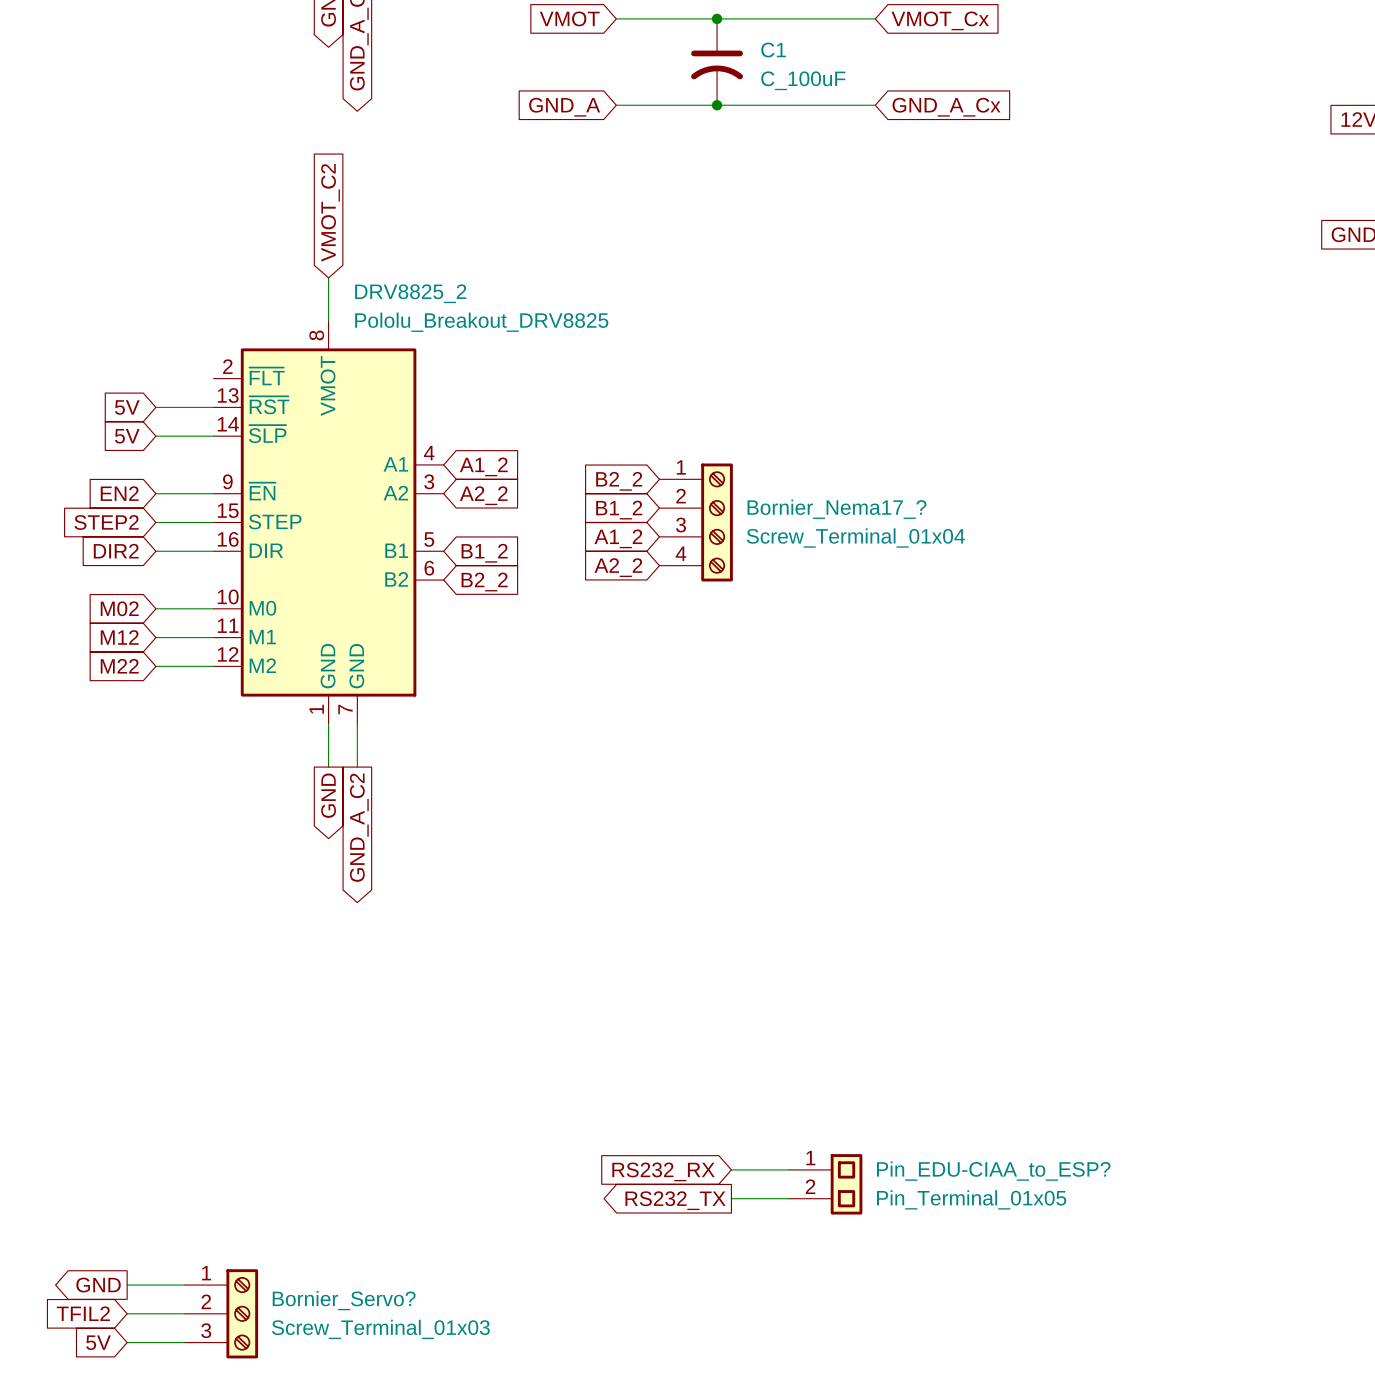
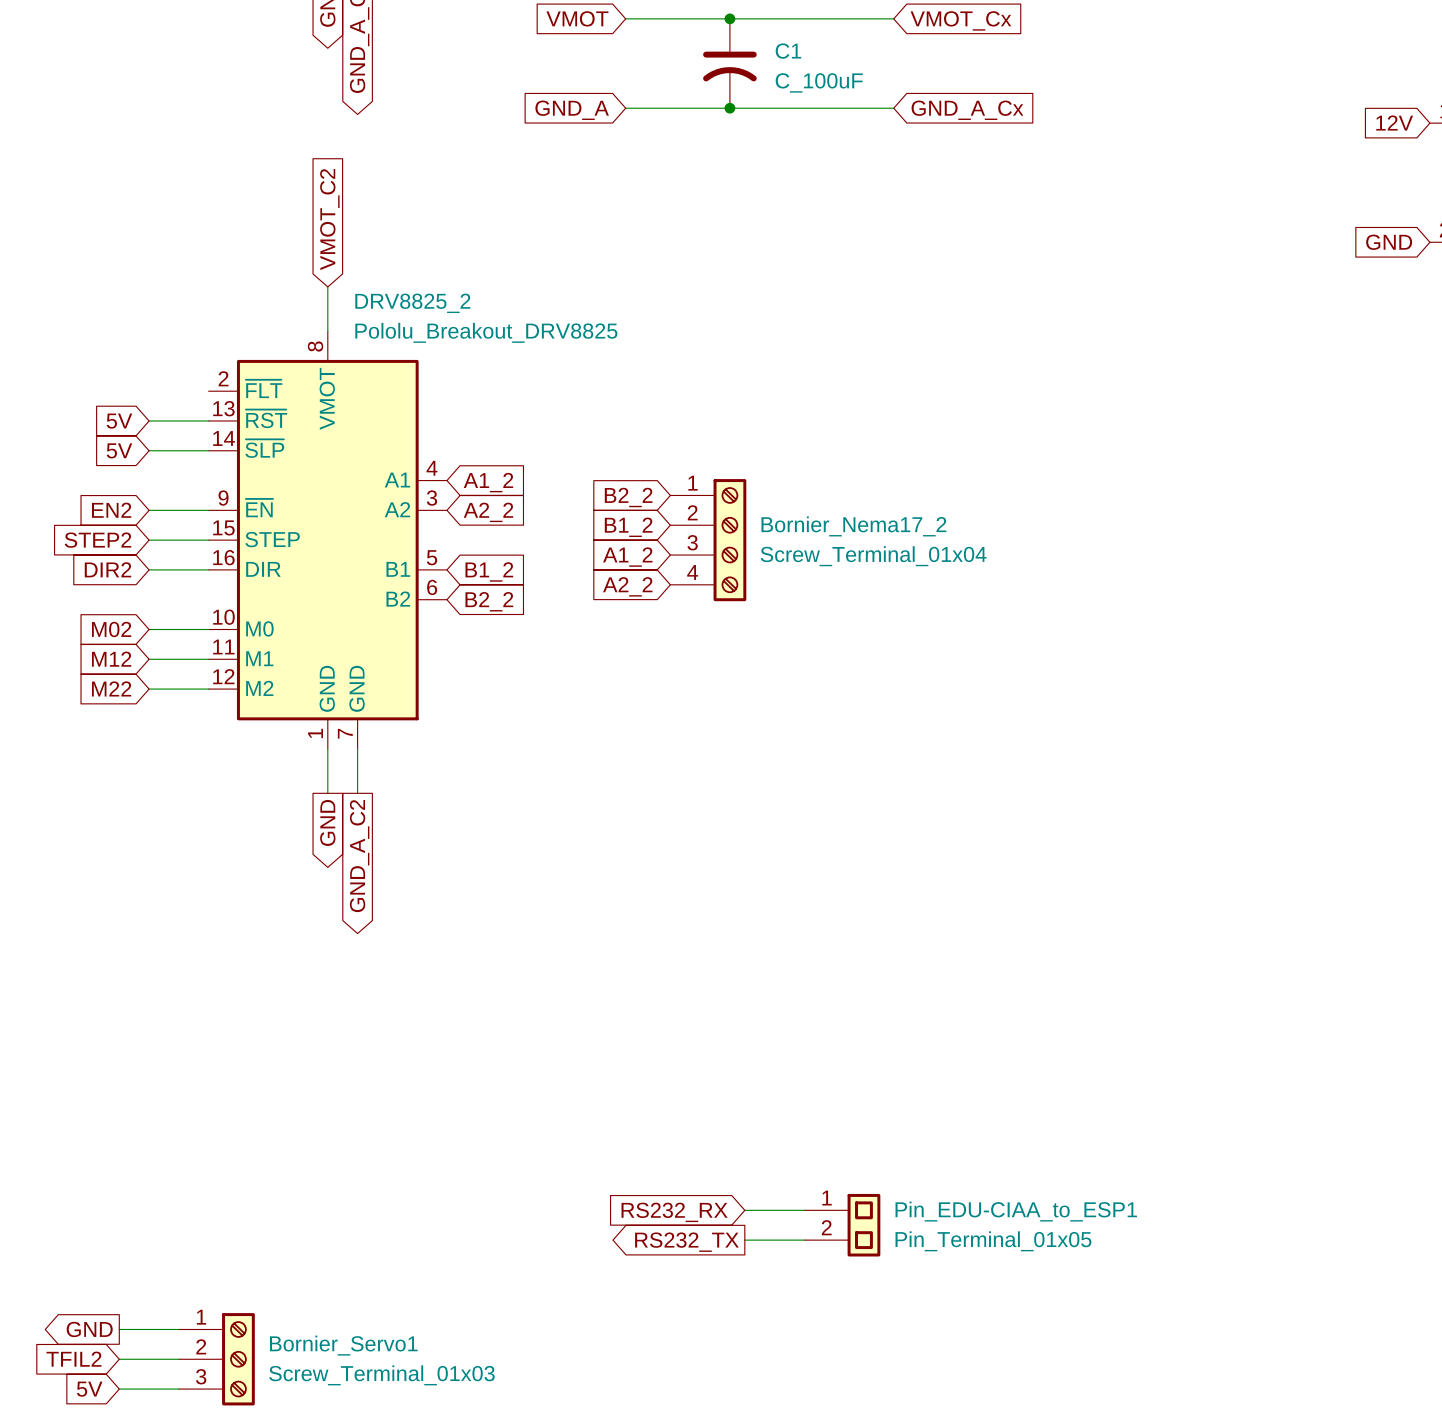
Bornier_Nema17_? name: Bornier_Nema17_? (836, 509) -> Bornier_Nema17_2 (853, 526)
Pin_EDU-CIAA_to_ESP? name: Pin_EDU-CIAA_to_ESP? (993, 1171) -> Pin_EDU-CIAA_to_ESP1 (1016, 1211)
Bornier_Servo? name: Bornier_Servo? (344, 1300) -> Bornier_Servo1 (343, 1345)

